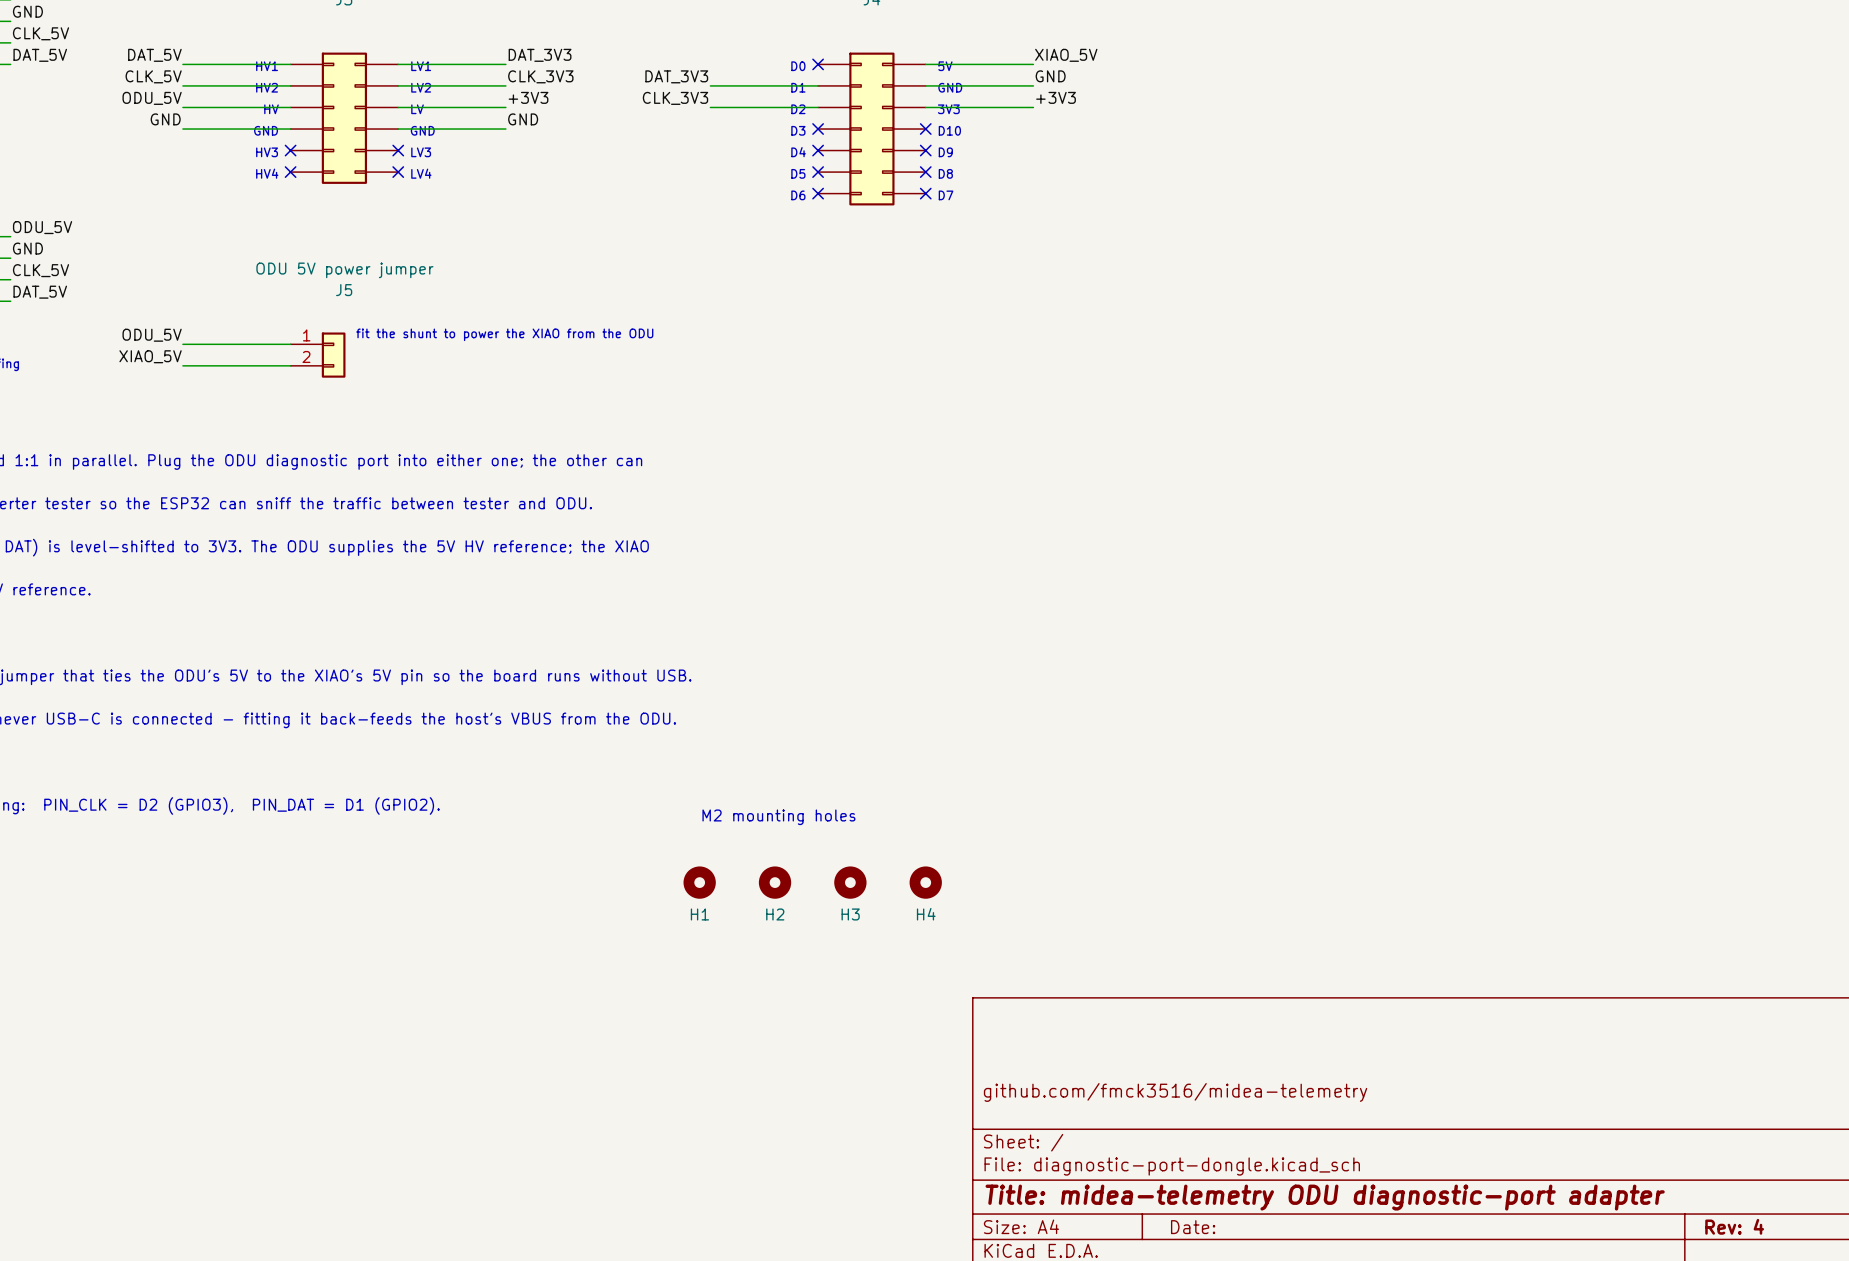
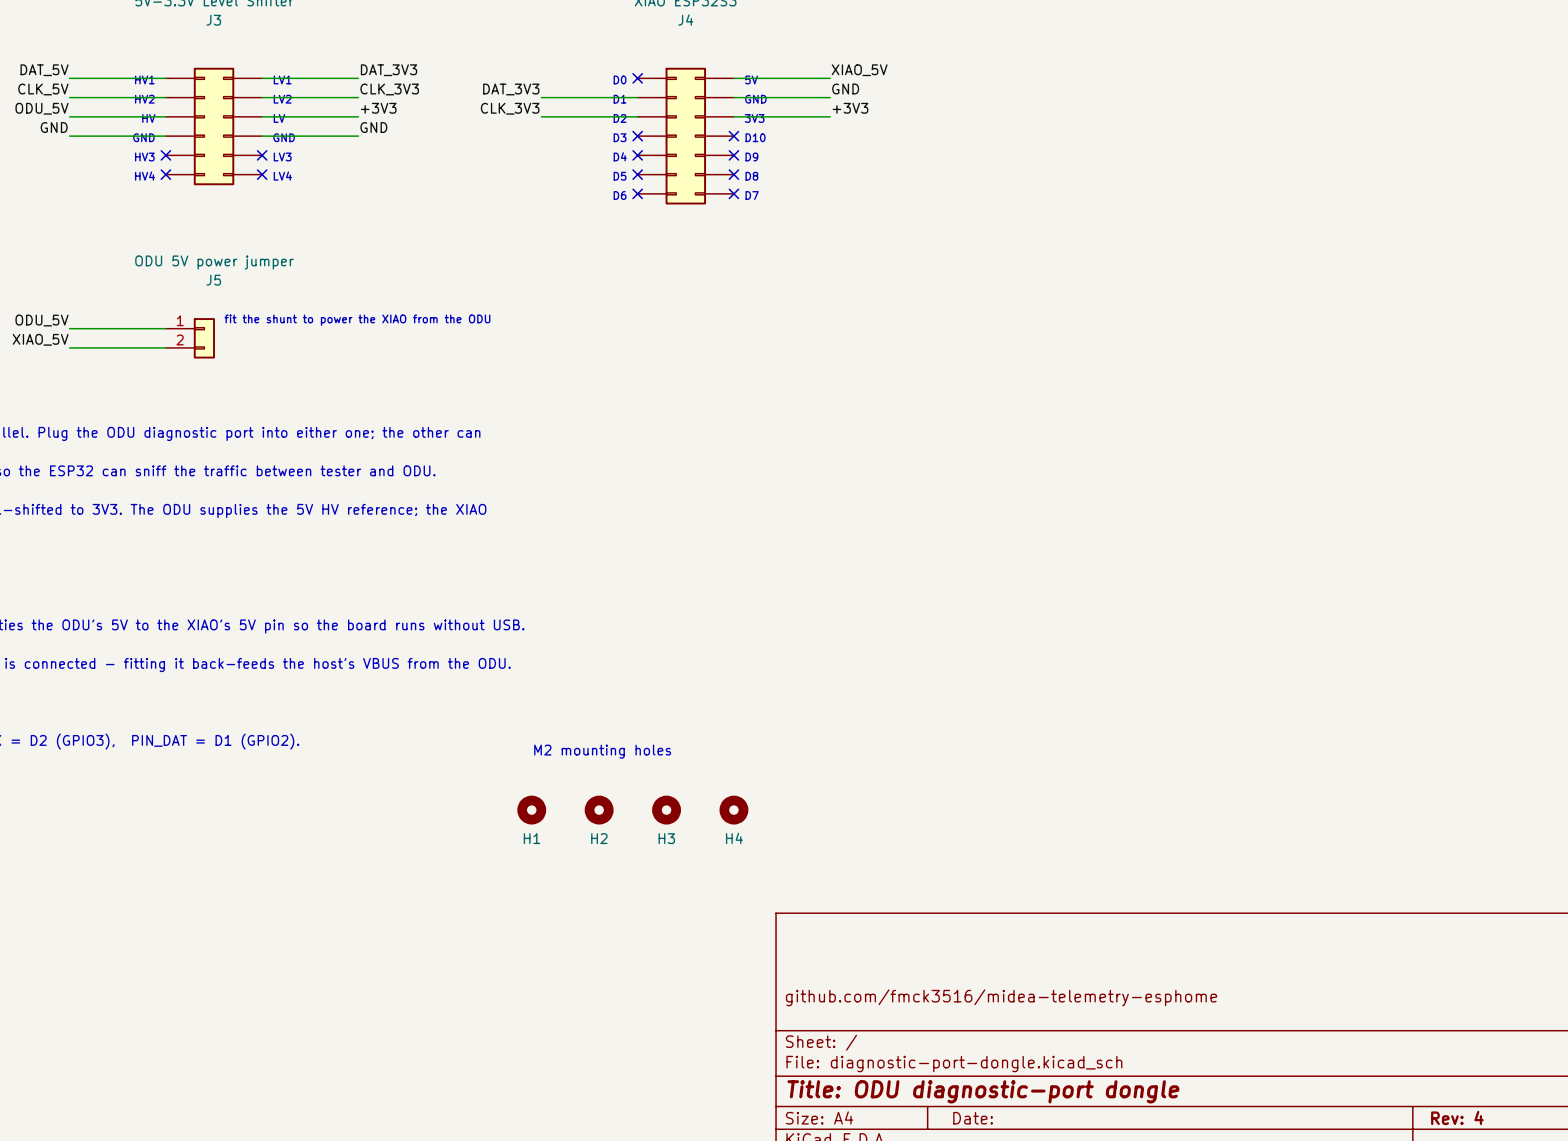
title block: github.com/fmck3516/midea-telemetry (1175, 1092) -> github.com/fmck3516/midea-telemetry-esphome (1001, 997)
title block: Title: midea-telemetry ODU diagnostic-port adapter (1325, 1197) -> Title: ODU diagnostic-port dongle (983, 1091)

